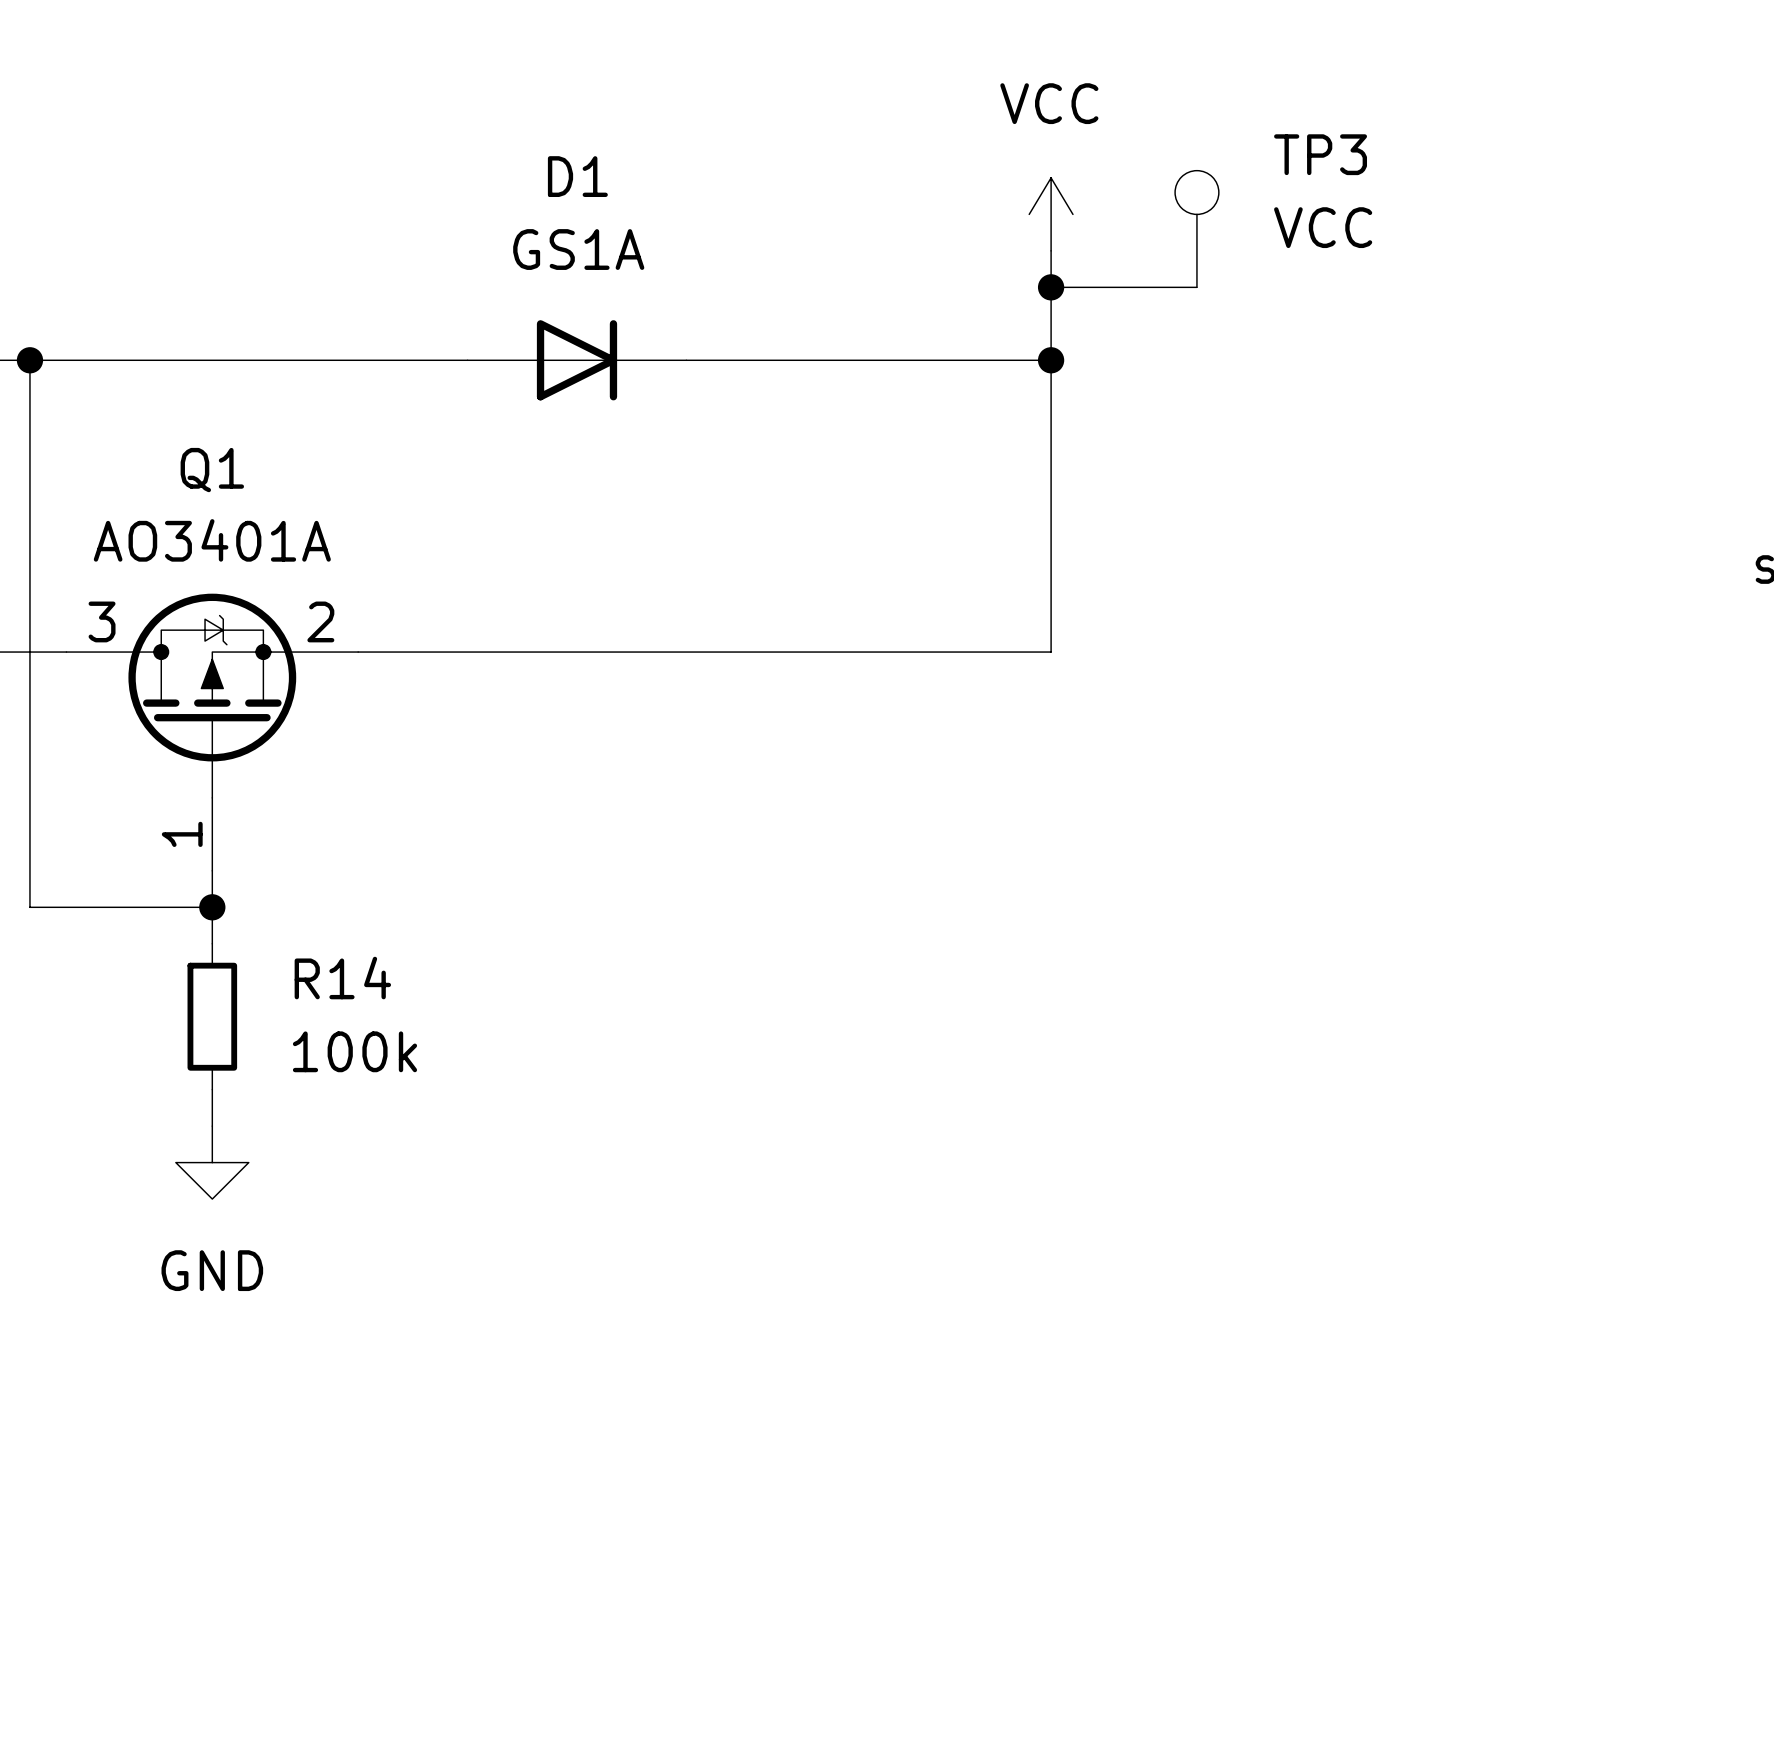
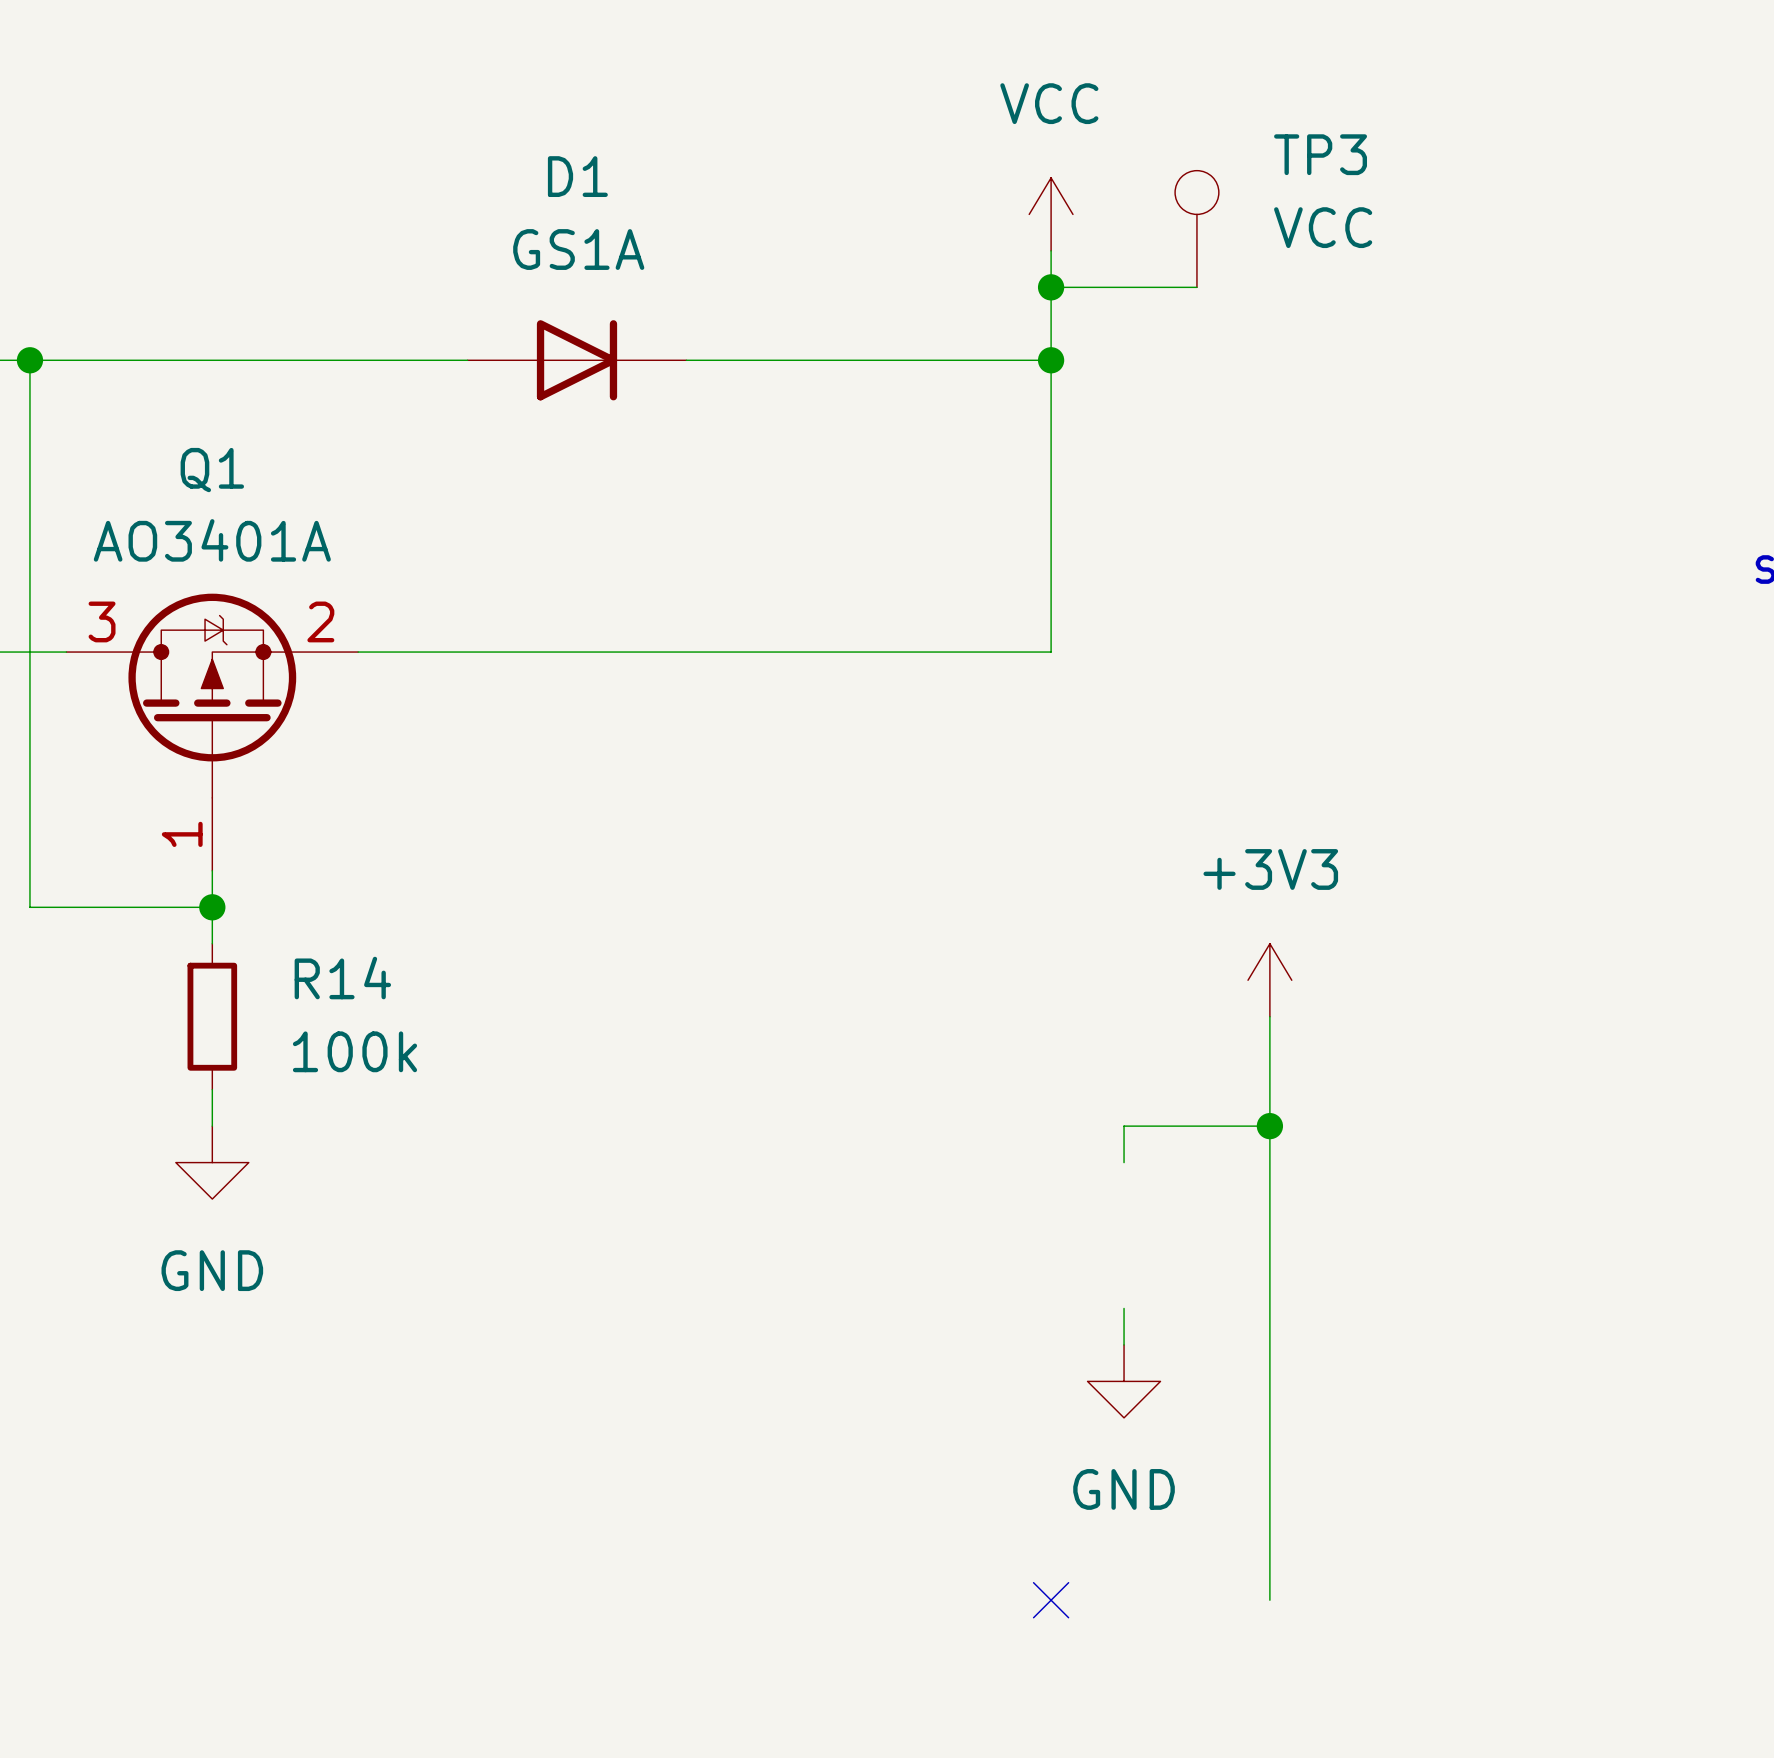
power symbol: none -> +3V3 (1269, 980)
wire: none -> (1269, 1016) (1269, 1600)
wire: none -> (1269, 1126) (1124, 1126) (1124, 1162)
junction: none -> (1269, 1126)
wire: none -> (1124, 1308) (1124, 1344)
power symbol: none -> GND (1124, 1381)
no-connect mark: none -> (1051, 1600)

